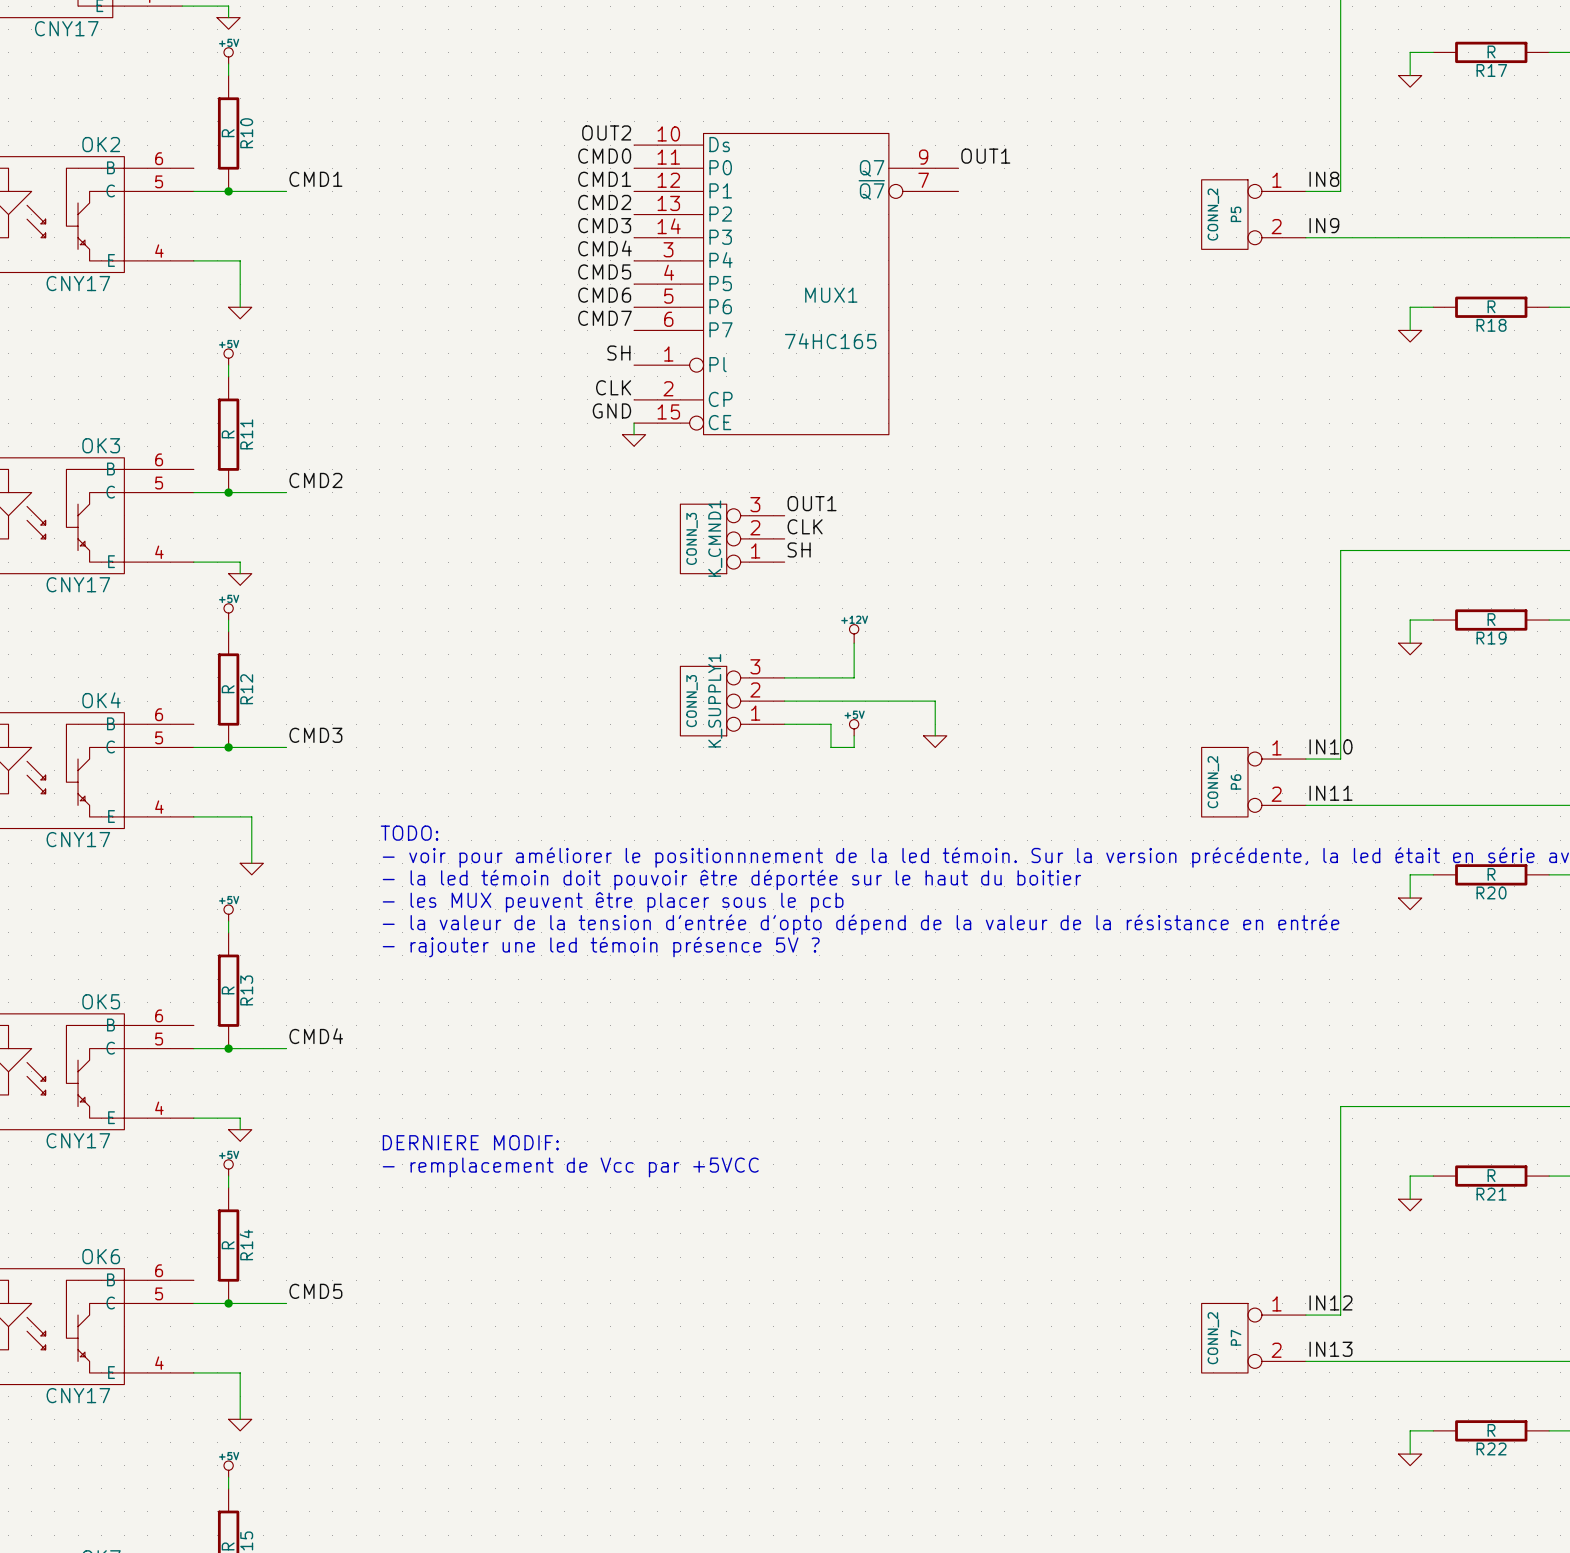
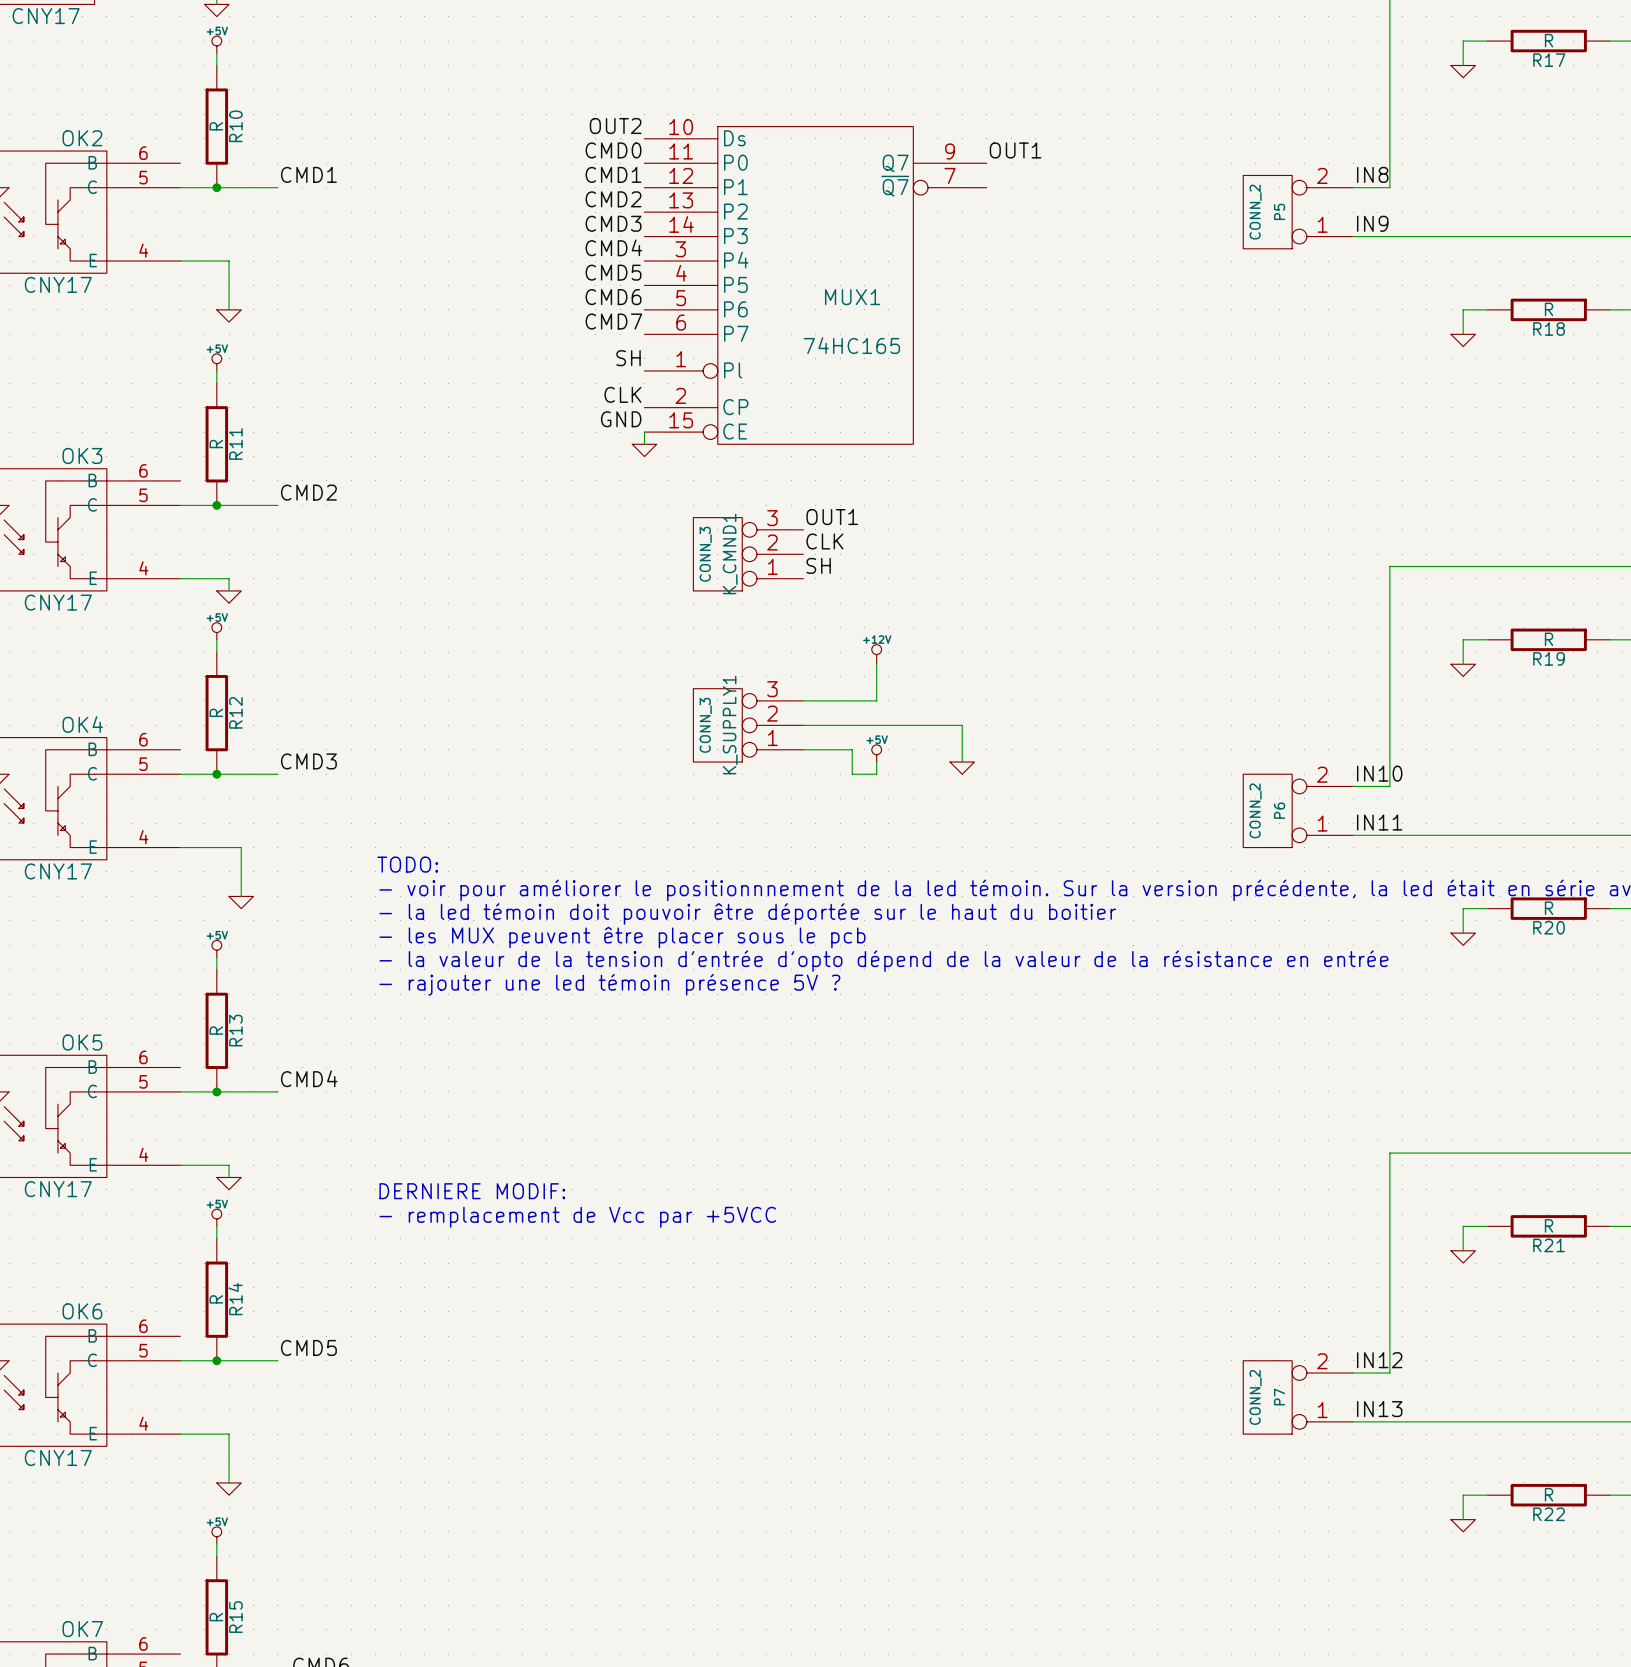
P5 flip: as is (1224, 214) -> up-down (1267, 212)
P6 flip: as is (1224, 782) -> up-down (1267, 810)
P7 flip: as is (1224, 1338) -> up-down (1267, 1397)

